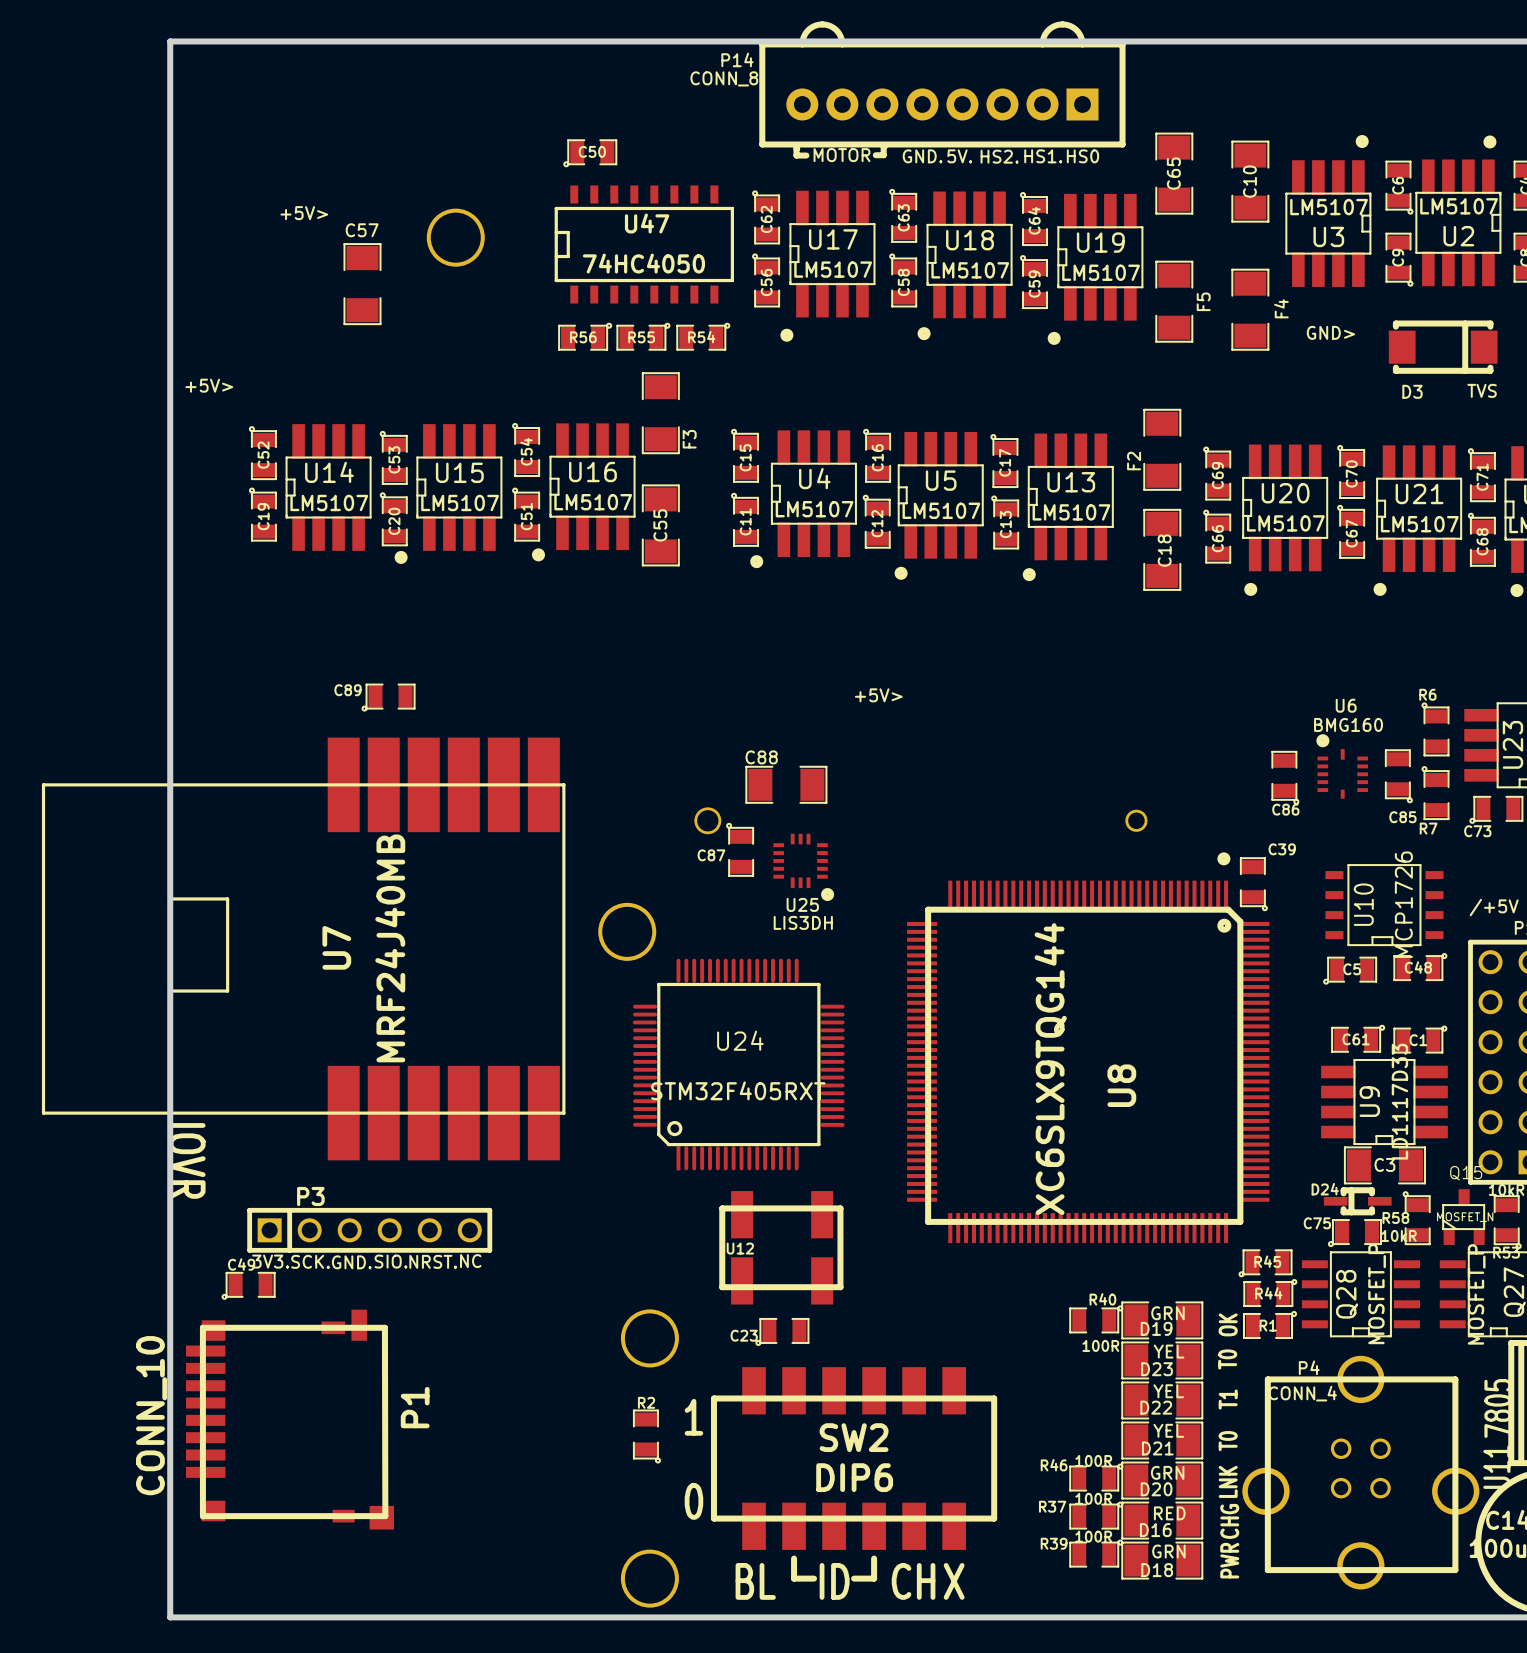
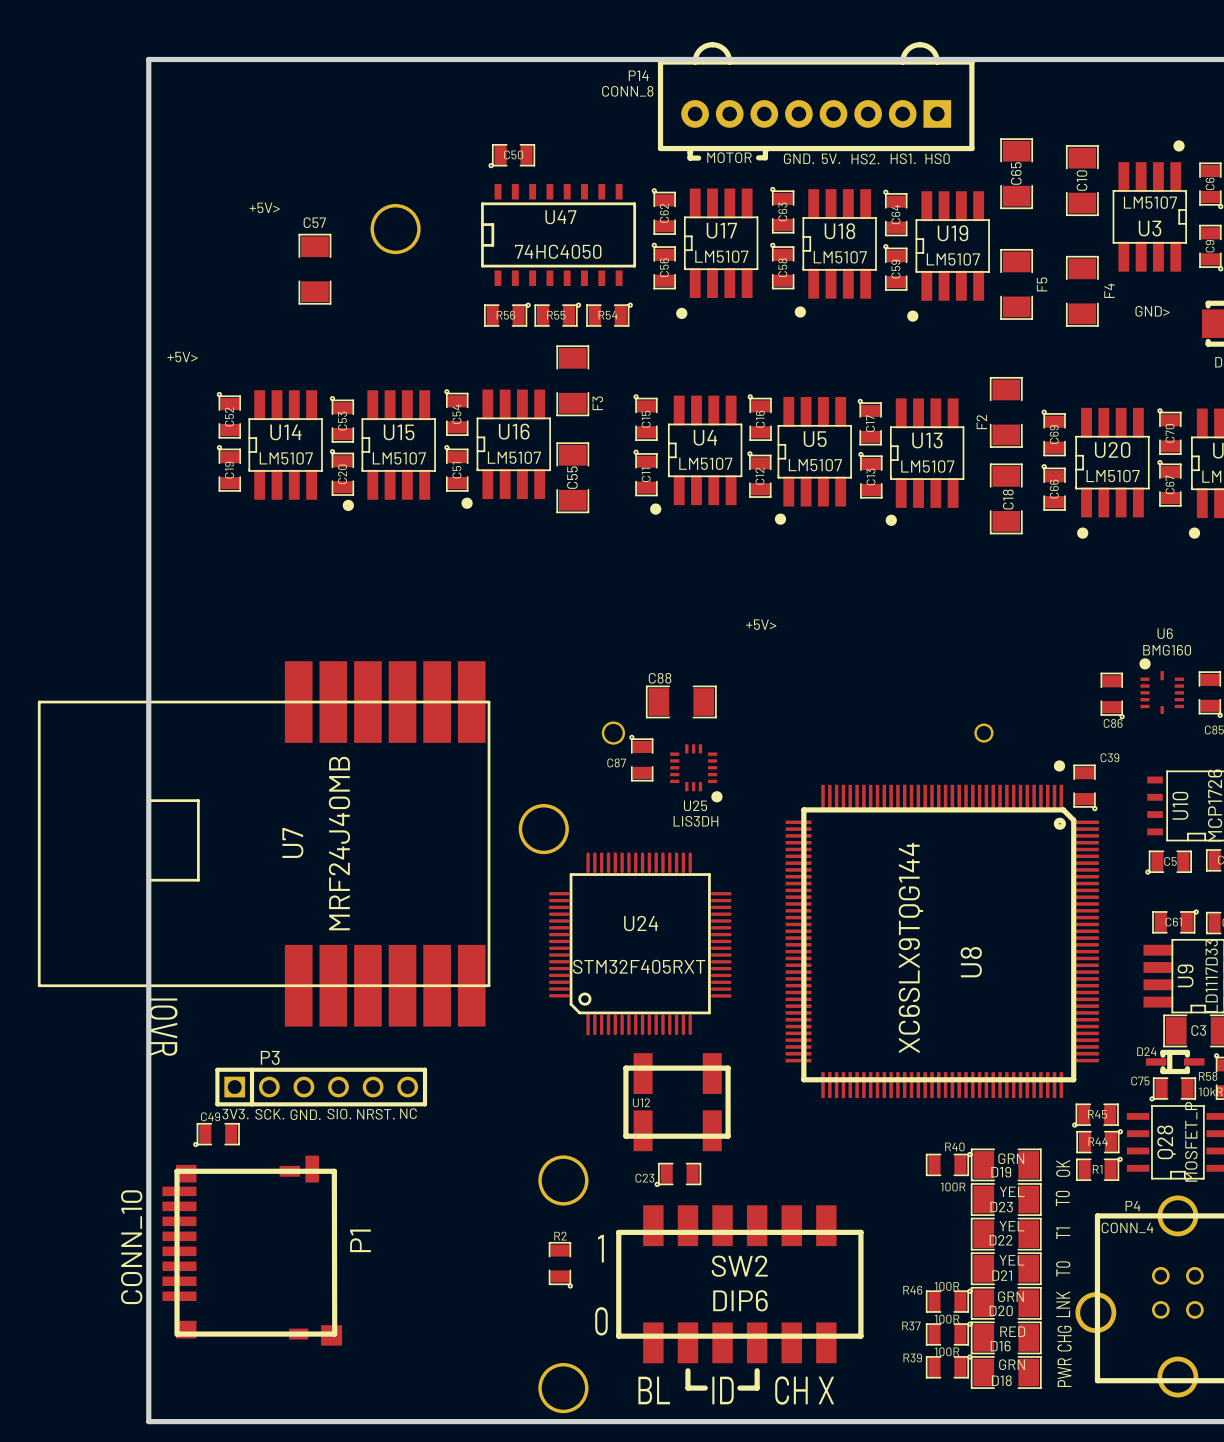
C89: (388, 697) -> none

